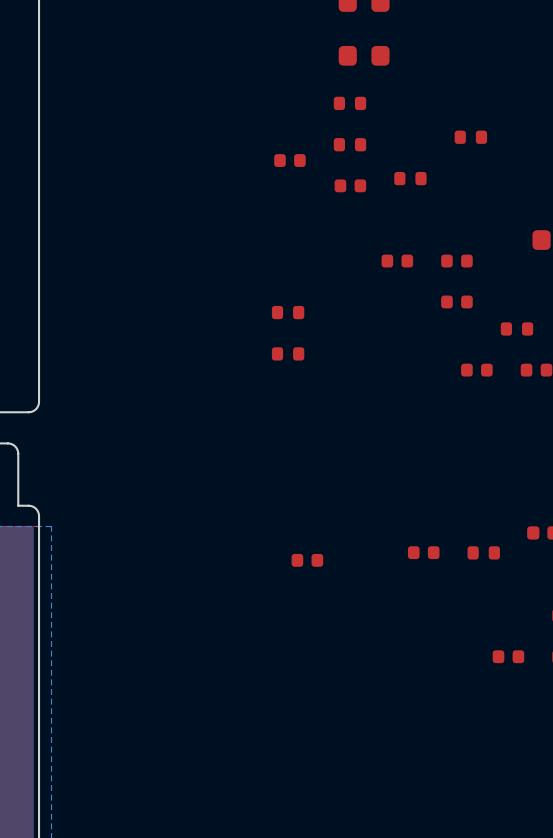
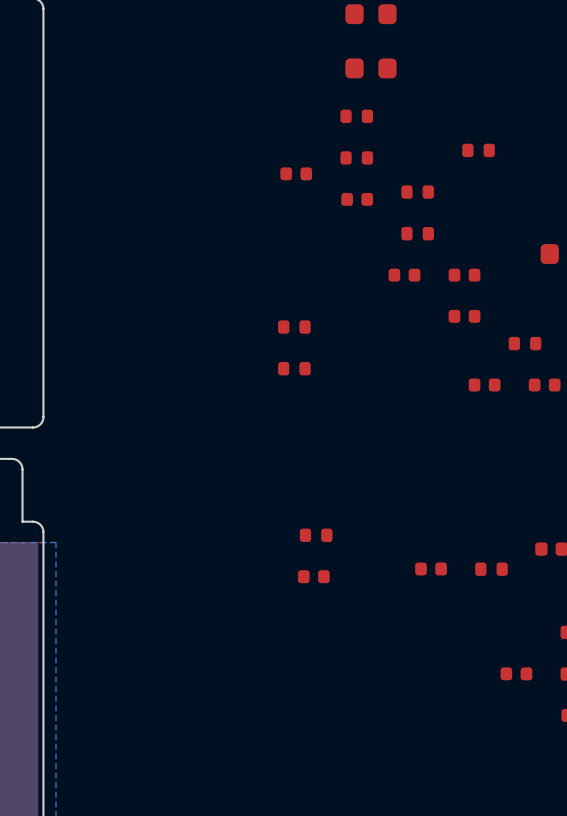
part: none -> (417, 233)
part: none -> (316, 535)

